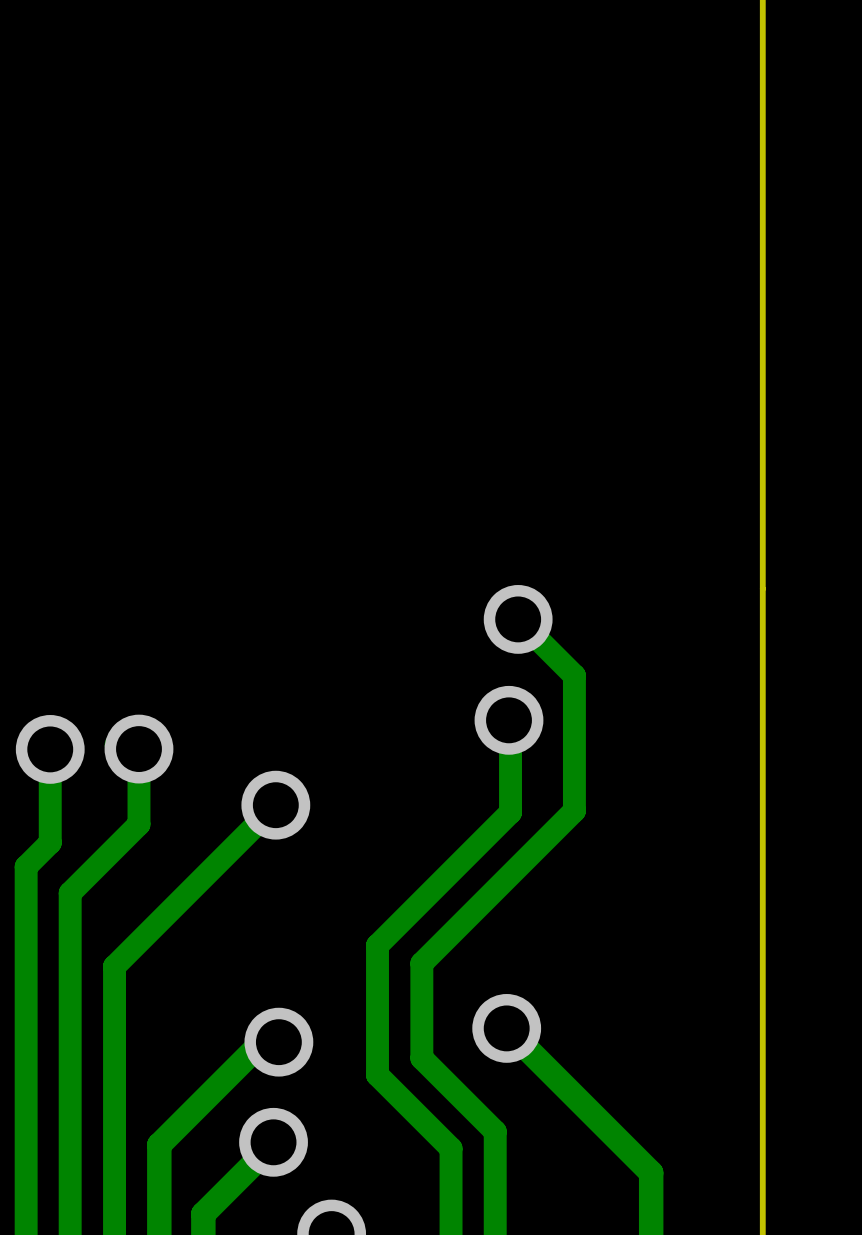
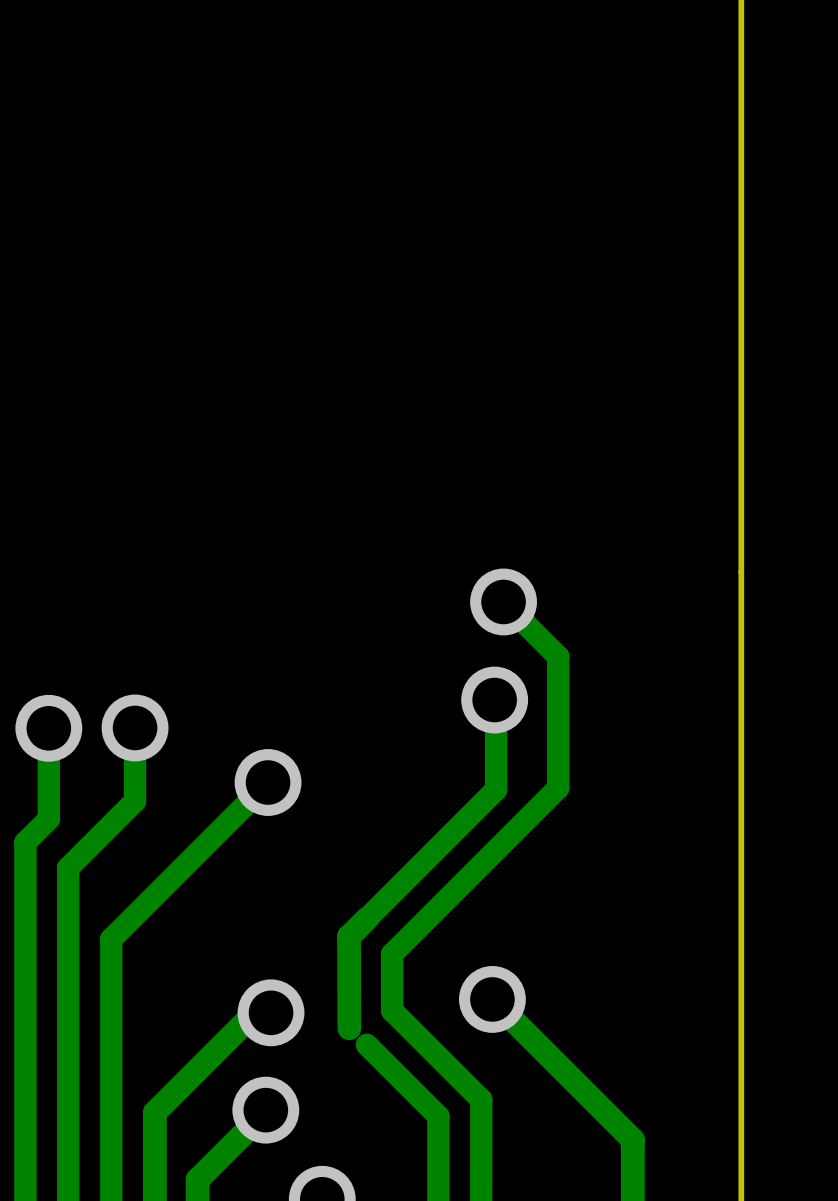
track: (377, 945) (377, 1075) -> (366, 918) (349, 936) (349, 1028)
track: (421, 963) (421, 1058) -> (409, 936) (392, 954) (392, 1010) (409, 1028)

